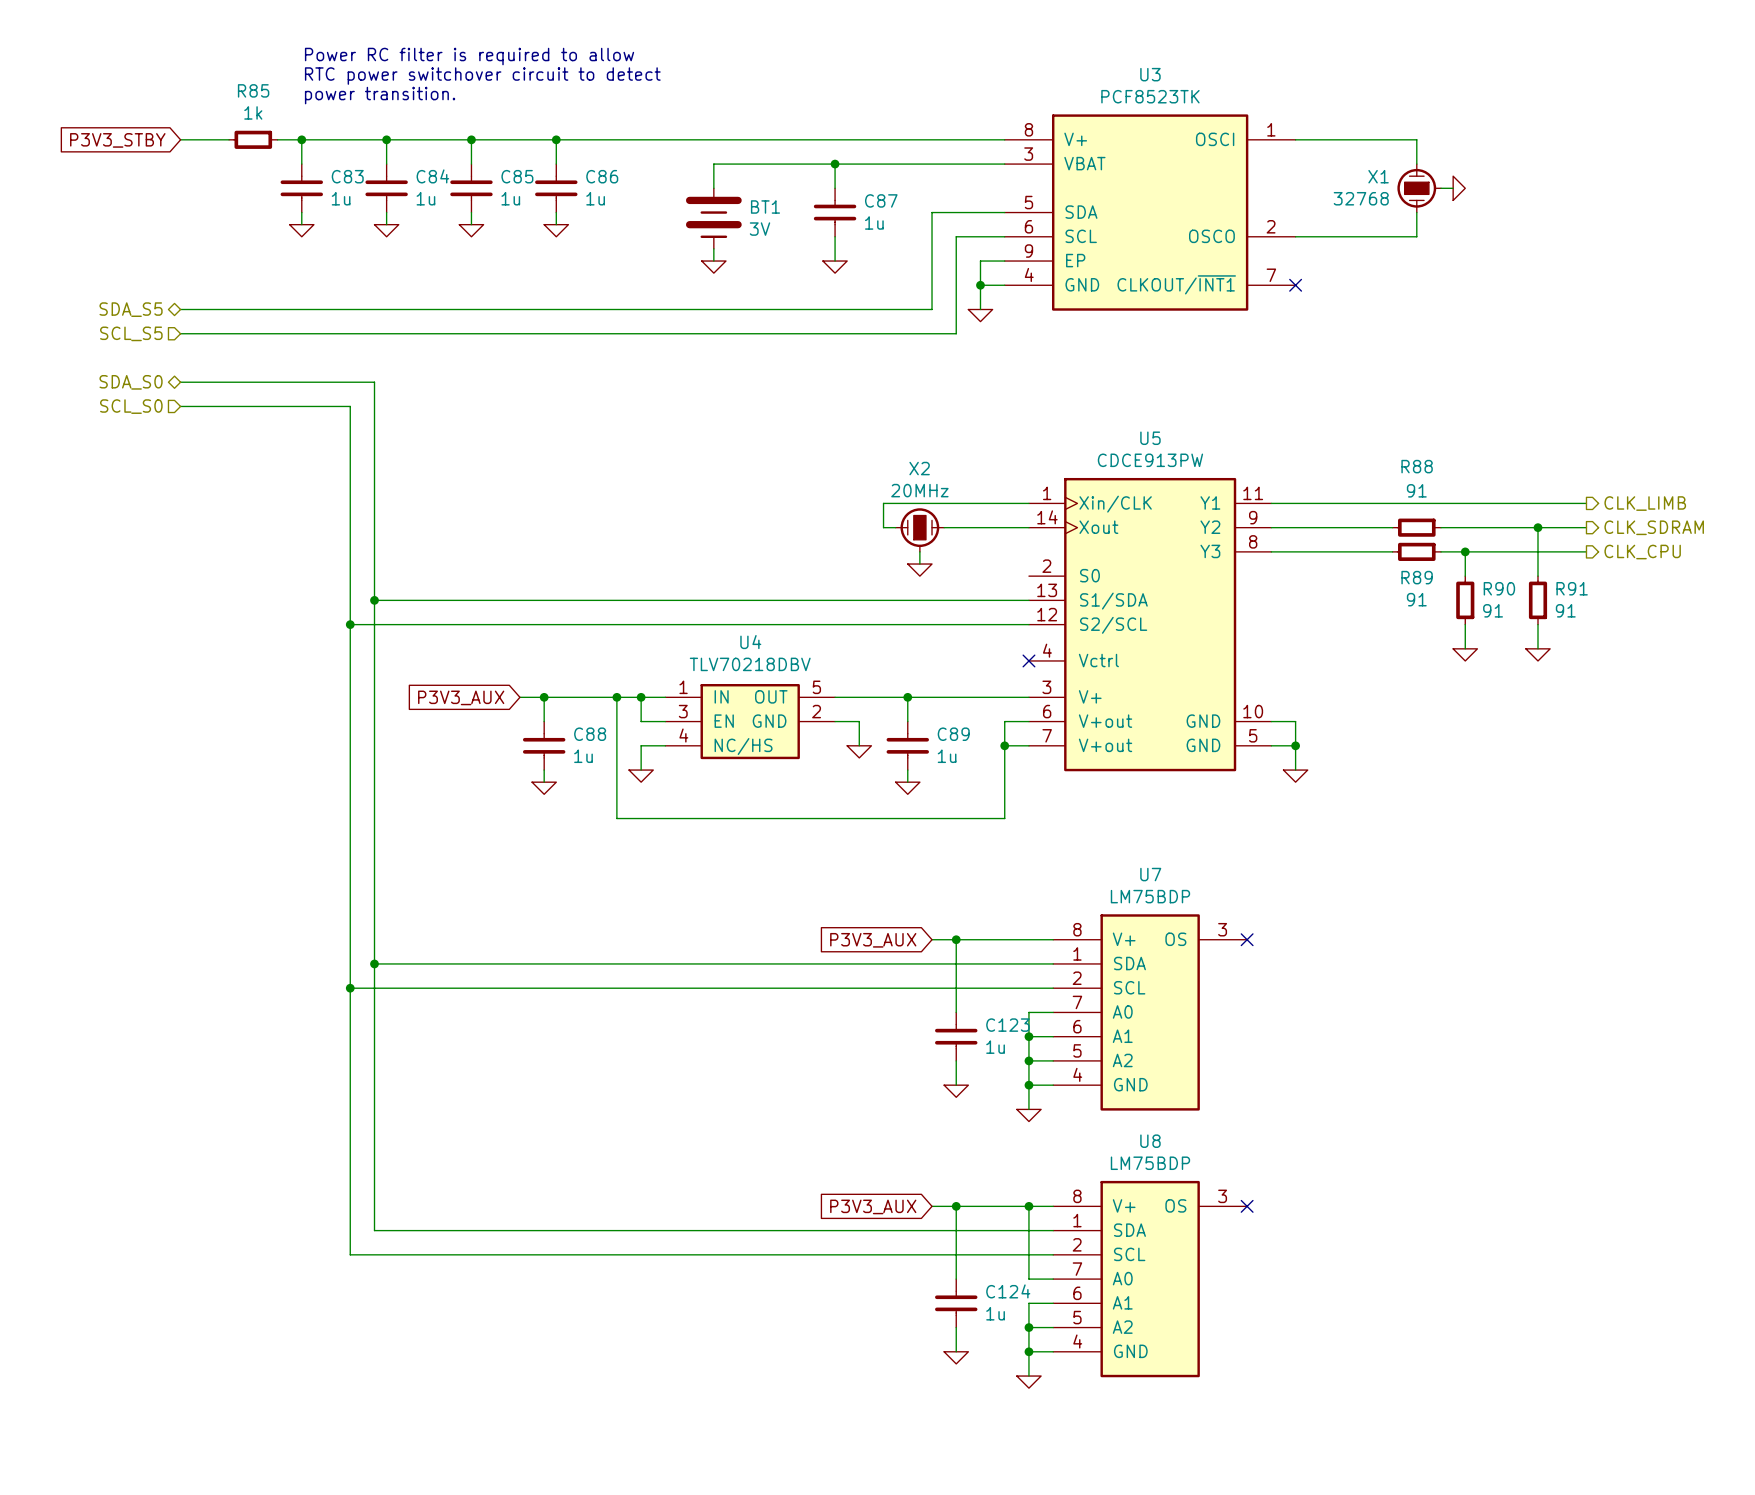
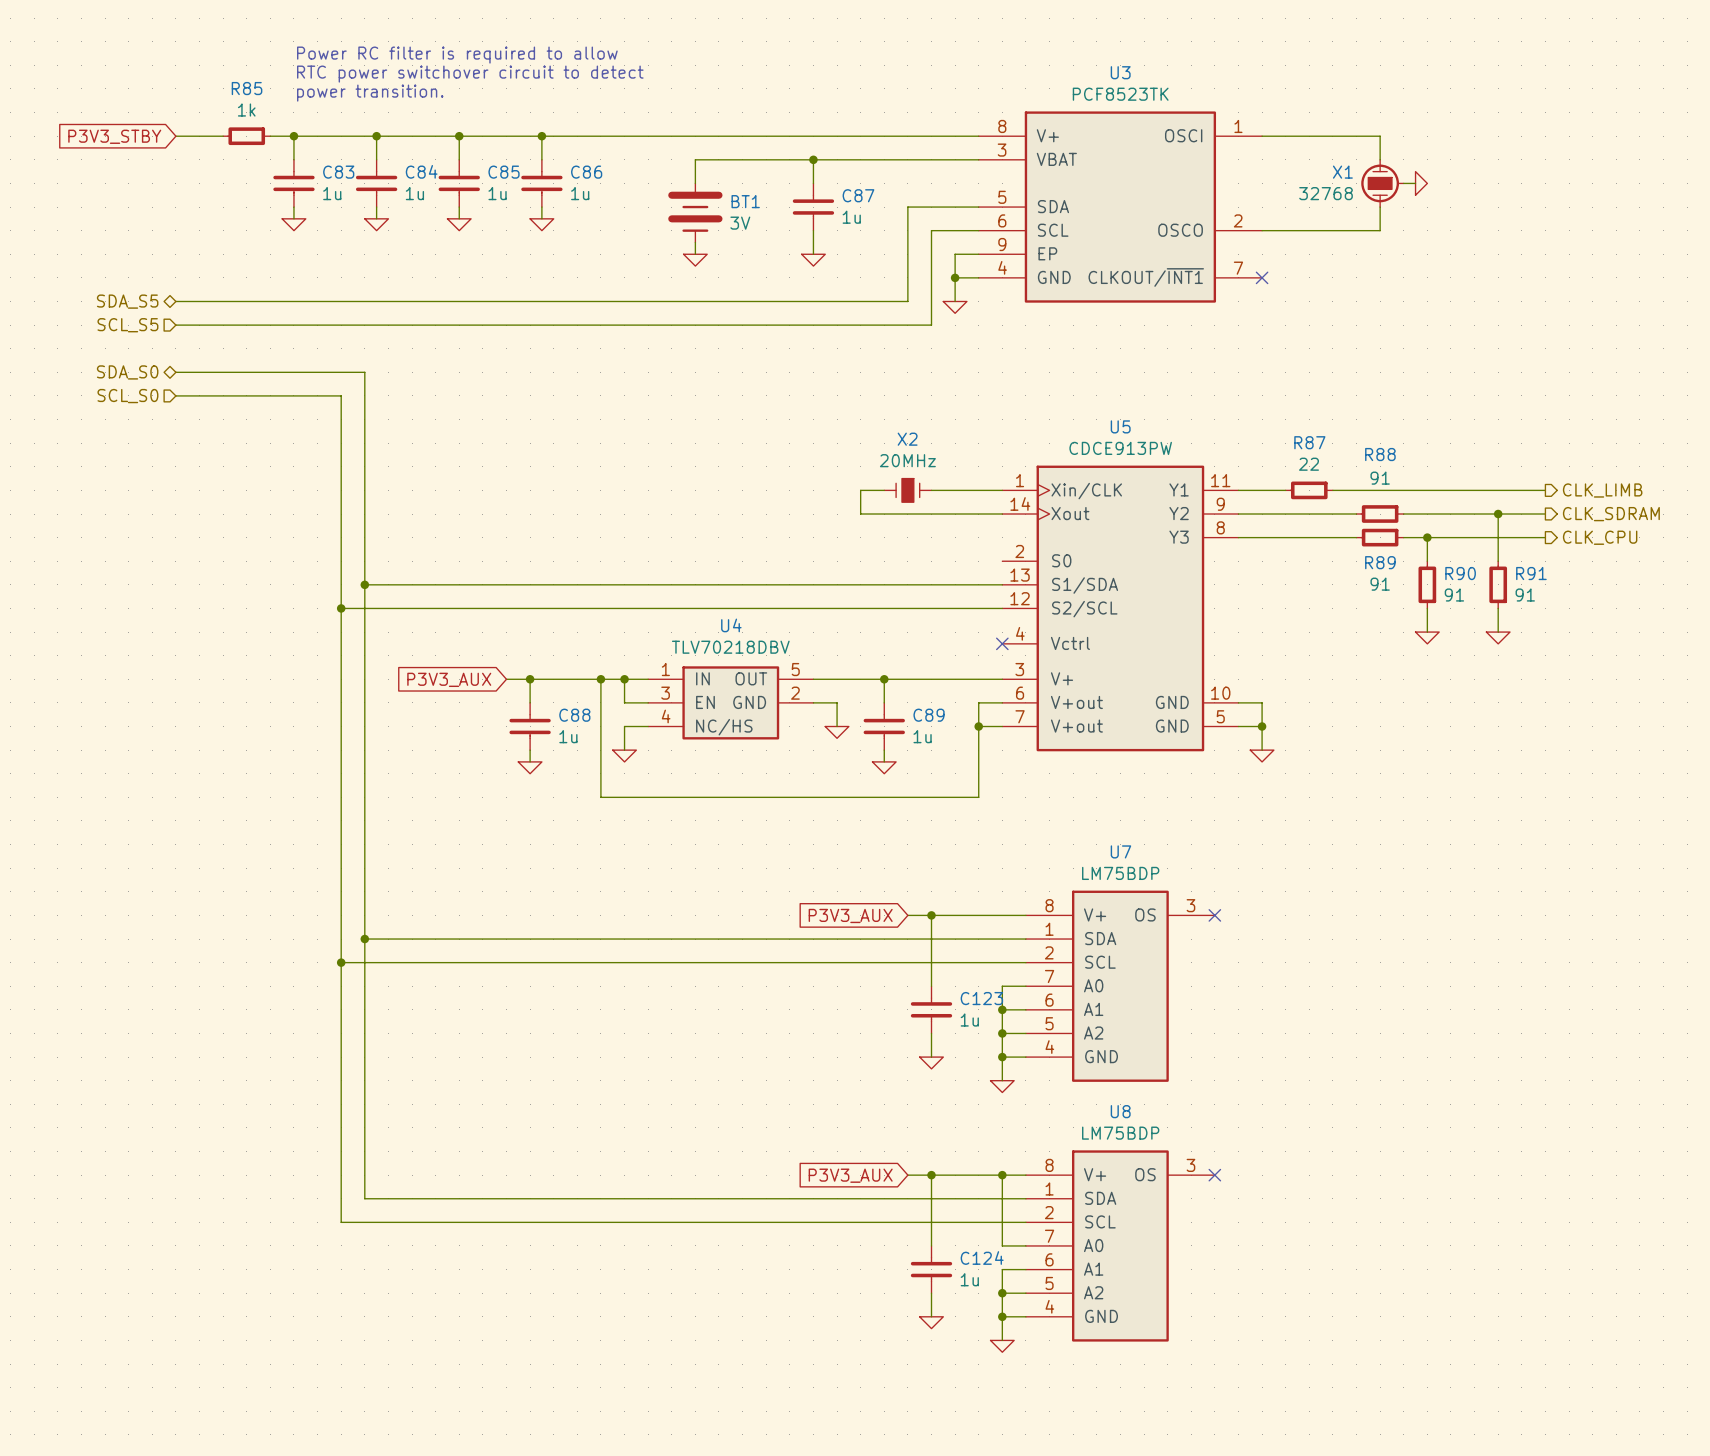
wire: (1319, 503) (1368, 503) -> none
R87: none -> 22 (1309, 490)
X2 symbol: [895, 508, 945, 552] -> [884, 478, 932, 503]
wire: (919, 551) (919, 564) -> none
power symbol: (919, 570) -> none

